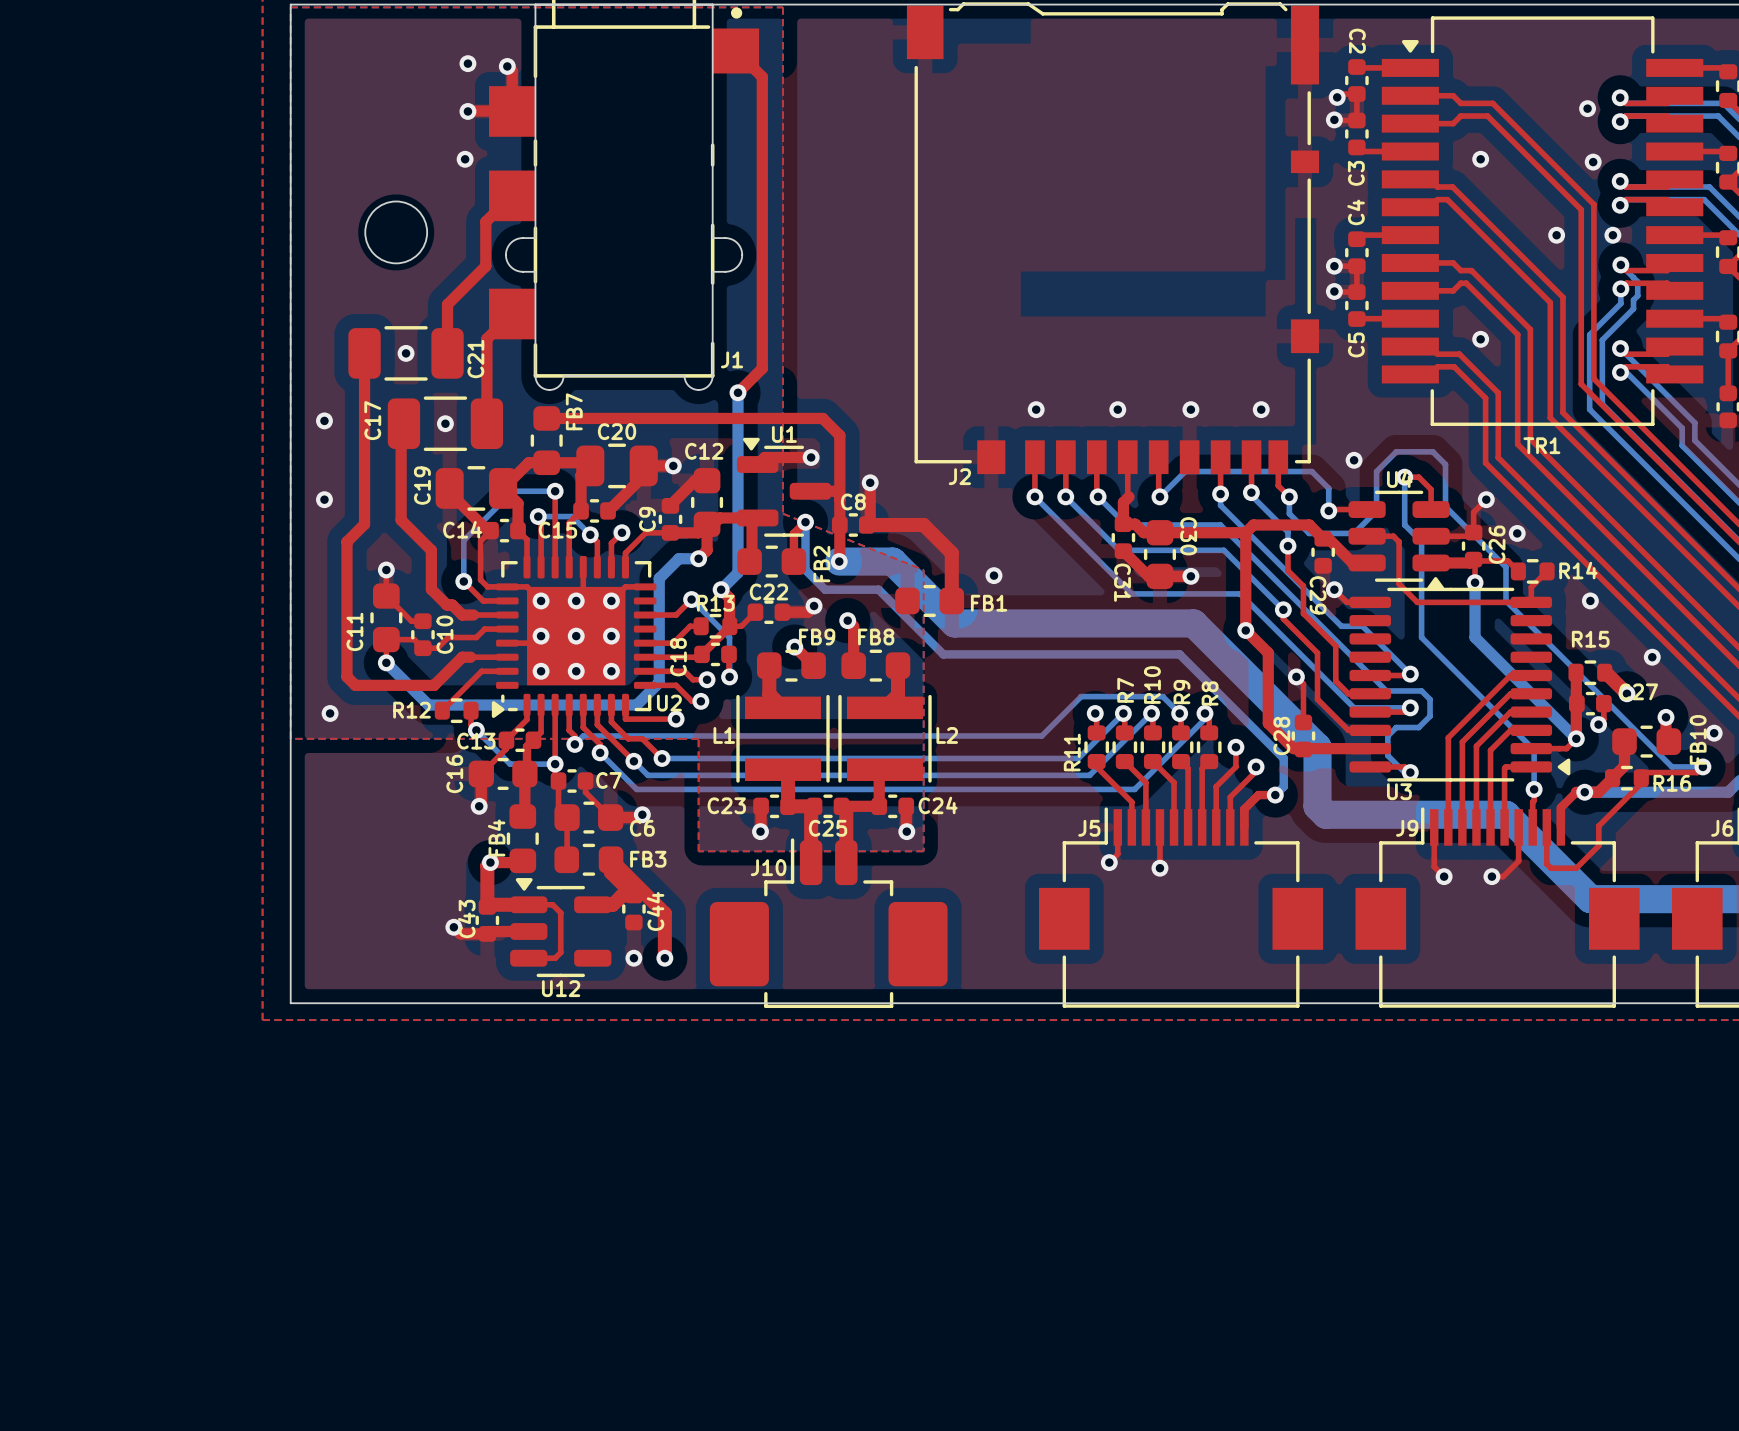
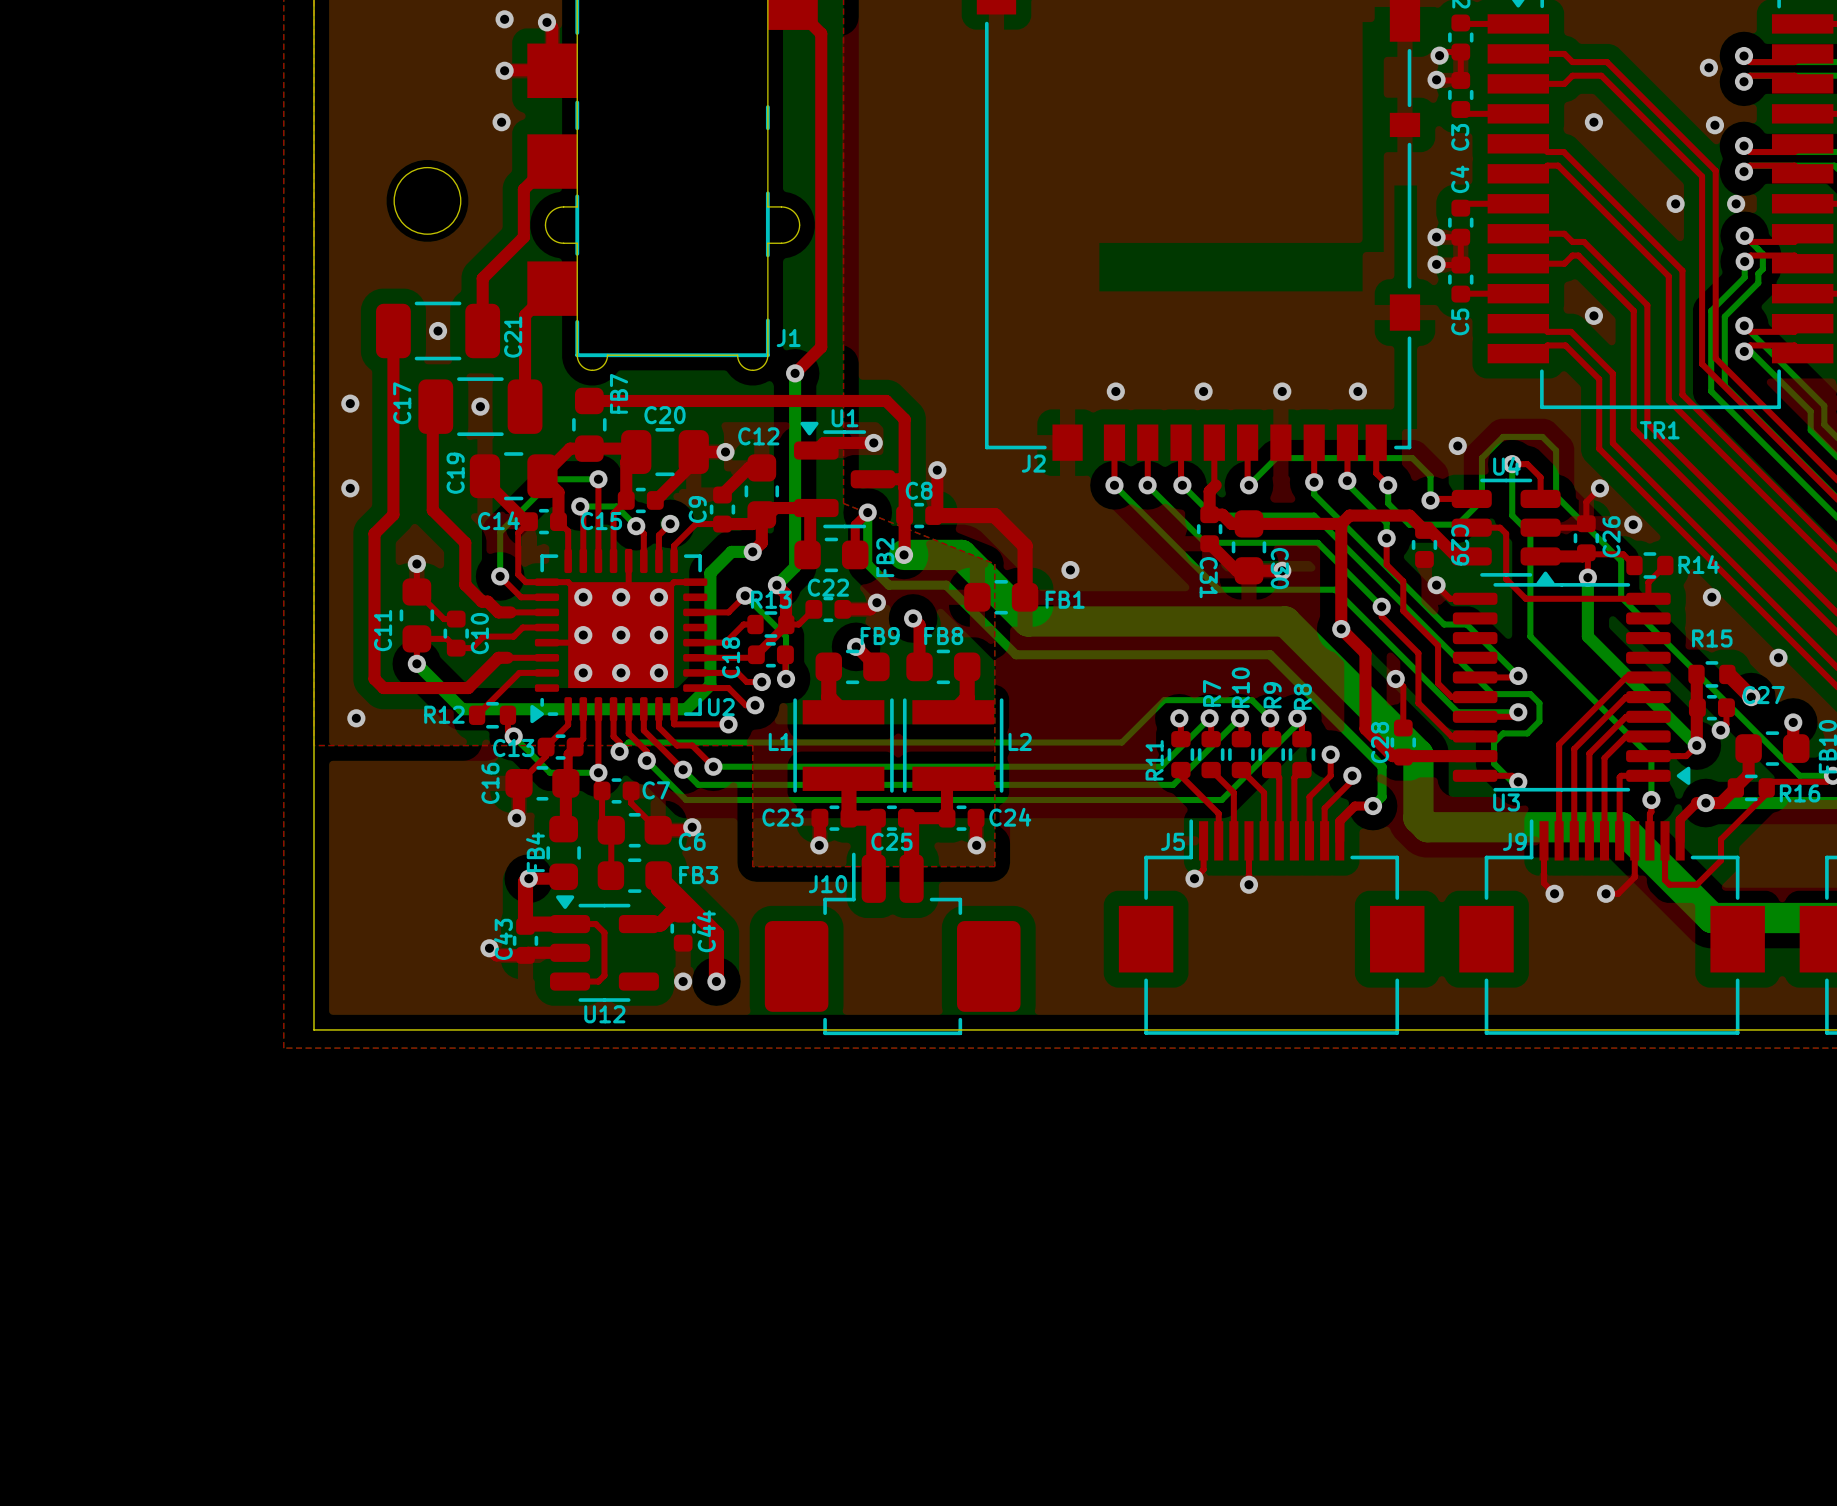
C30 name position: C30 (1188, 536) -> C30 (1279, 568)
C29 name position: C29 (1318, 595) -> C29 (1460, 544)

